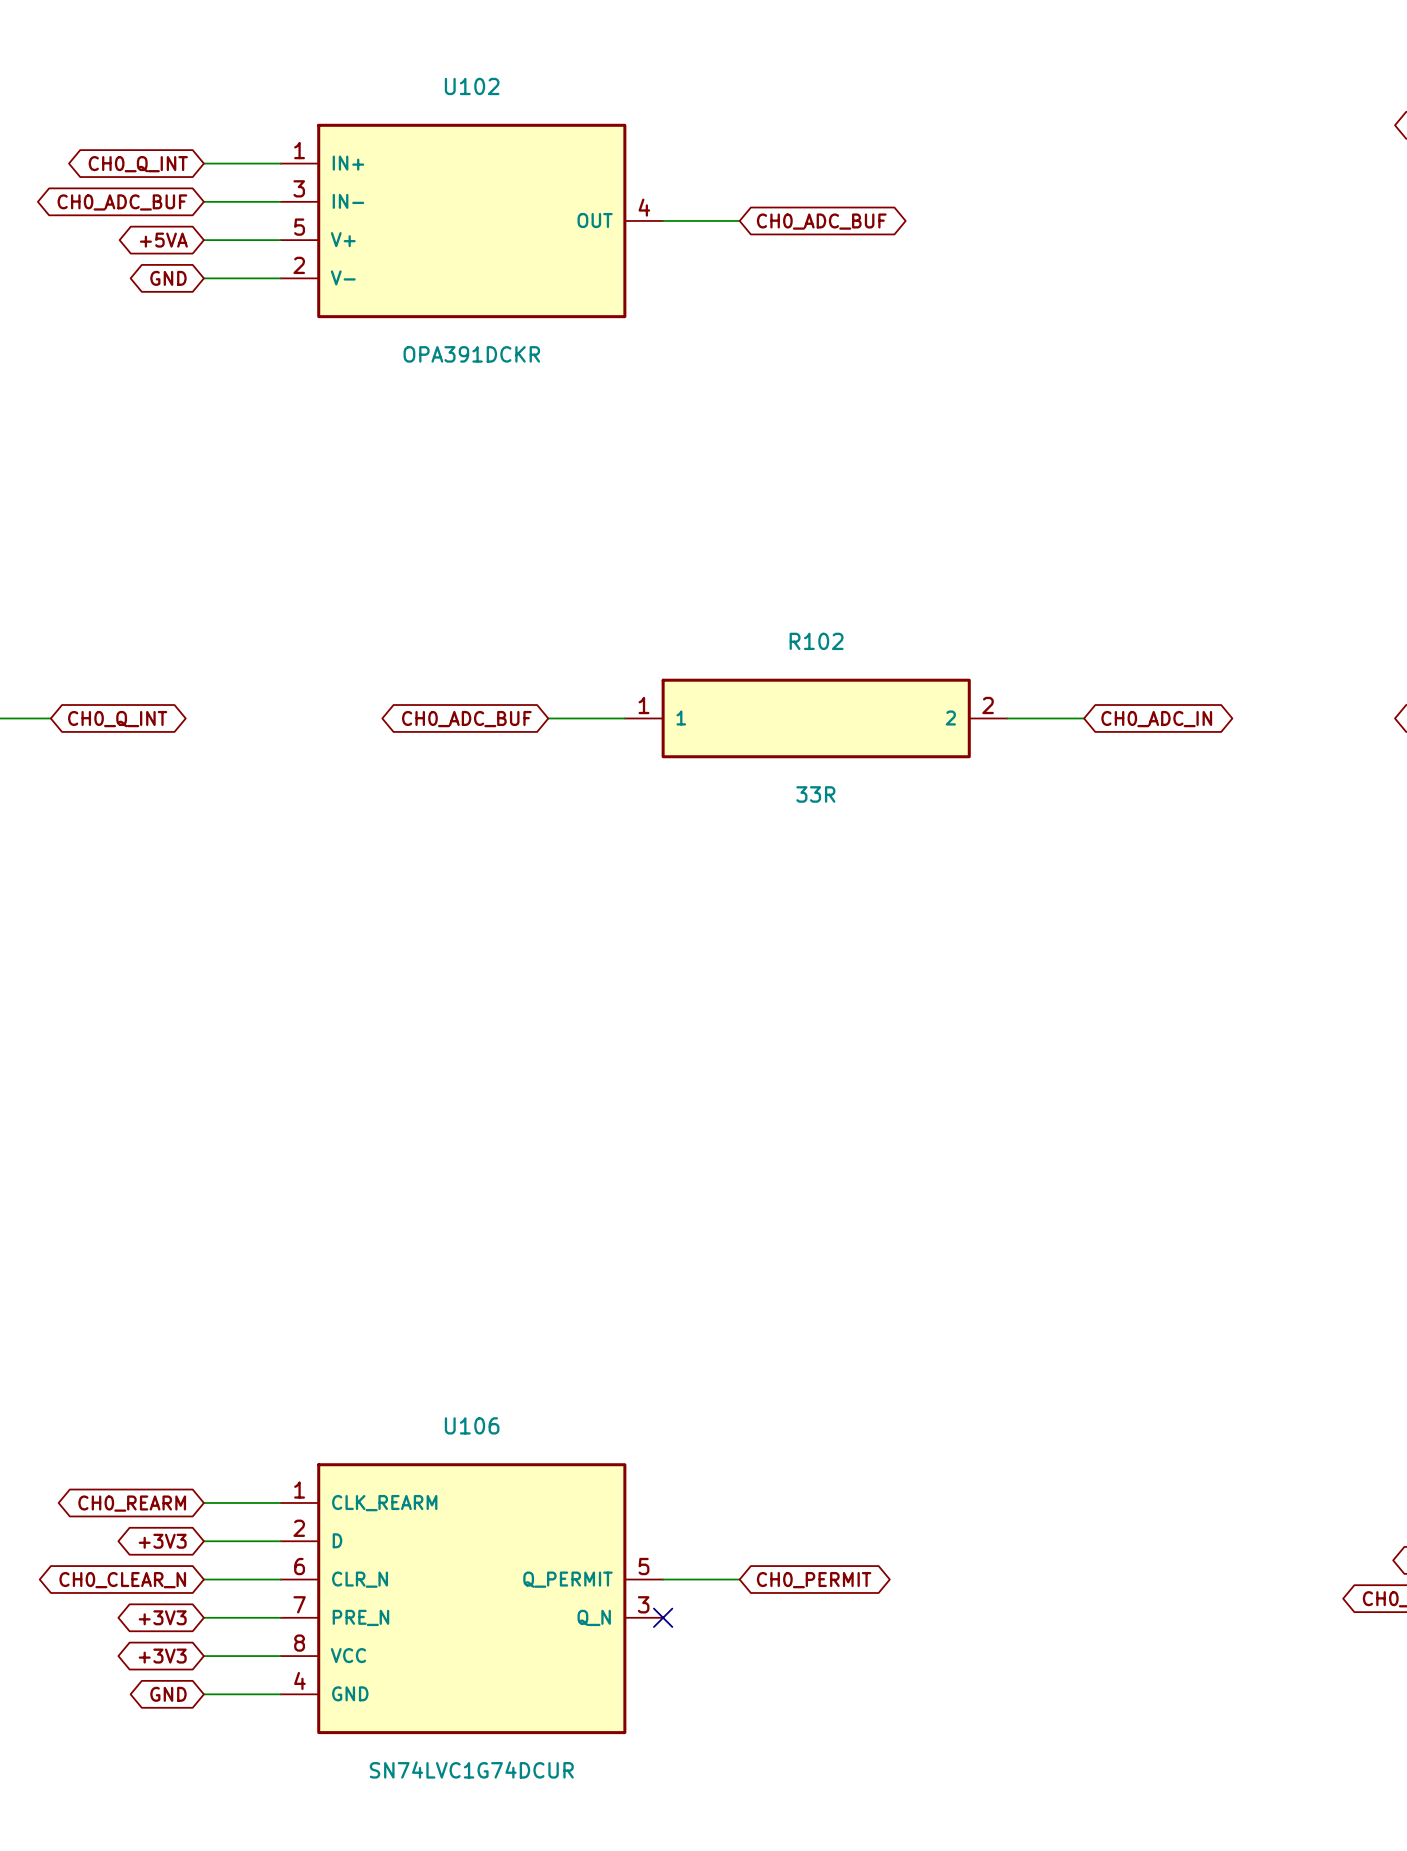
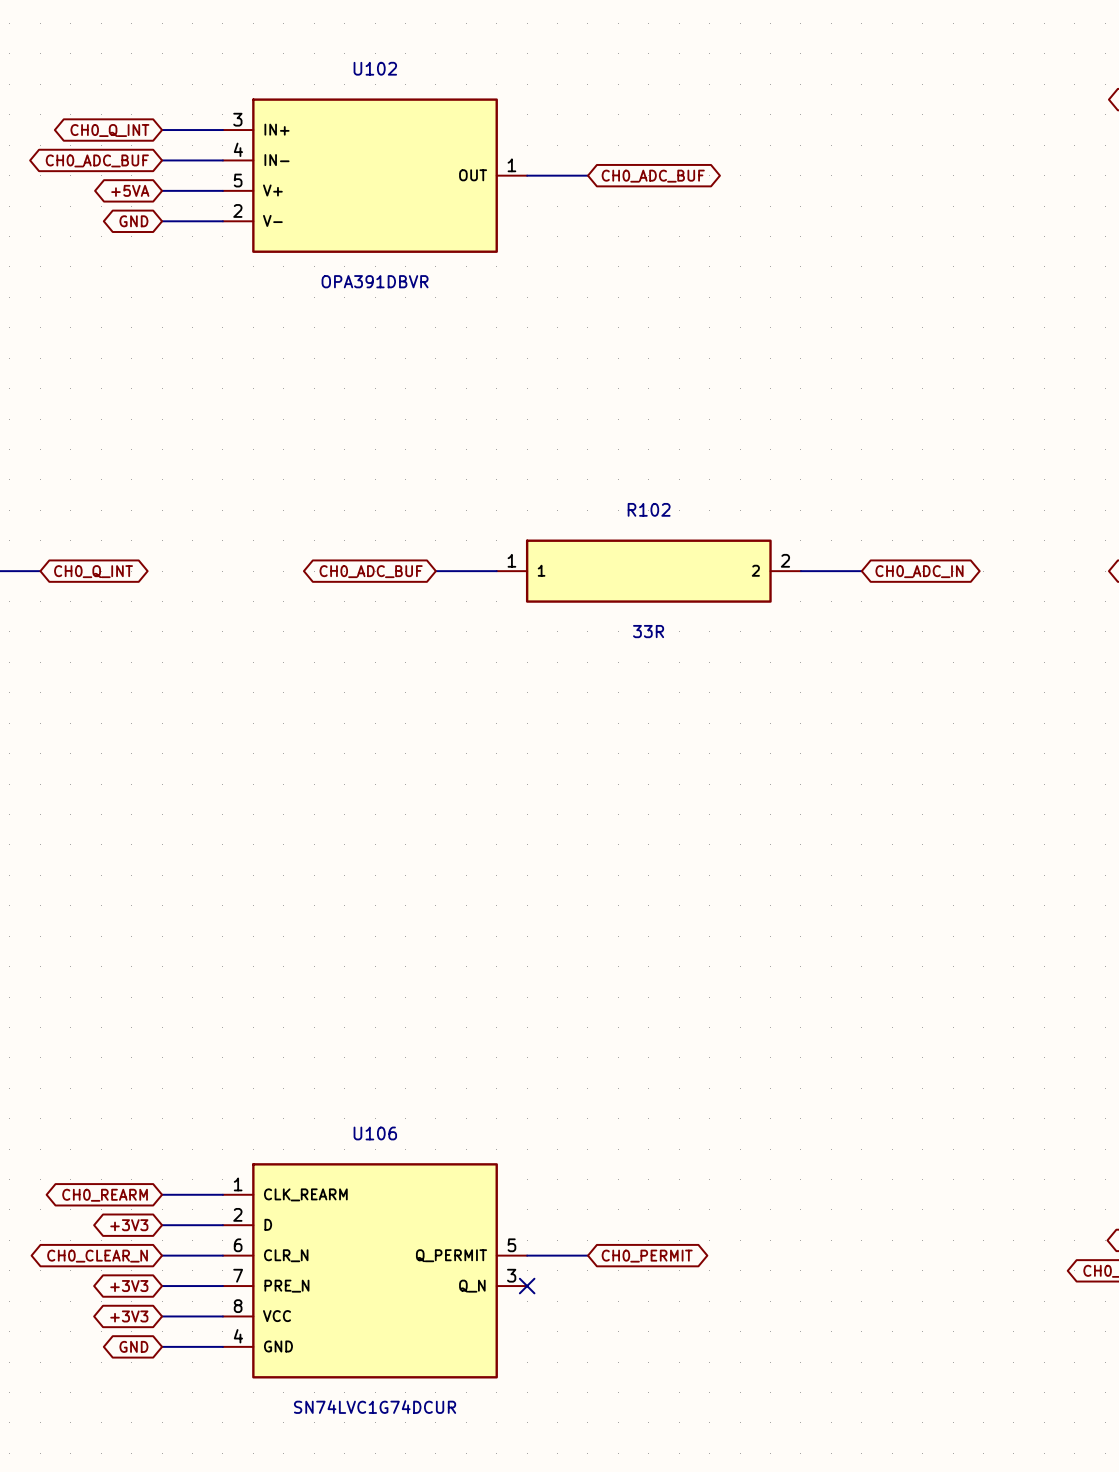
U102 pin number: 1 (299, 150) -> 3 (237, 119)
U102 pin number: 3 (299, 188) -> 4 (238, 149)
U102 pin number: 4 (644, 207) -> 1 (511, 165)
U102 value: OPA391DCKR (471, 354) -> OPA391DBVR (375, 281)

